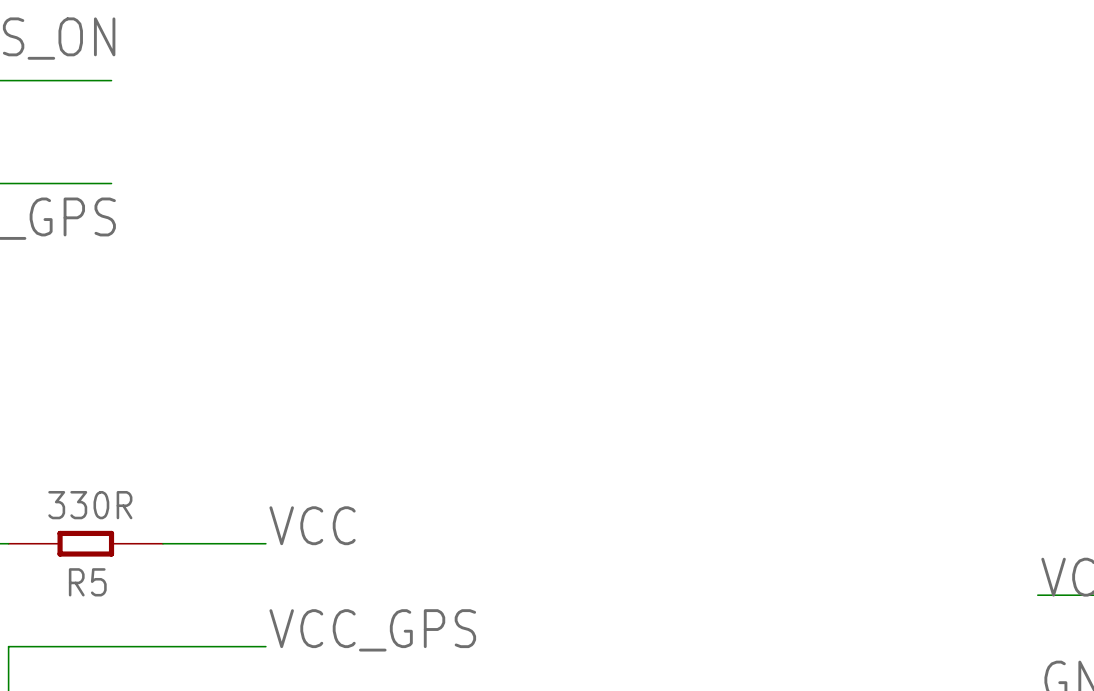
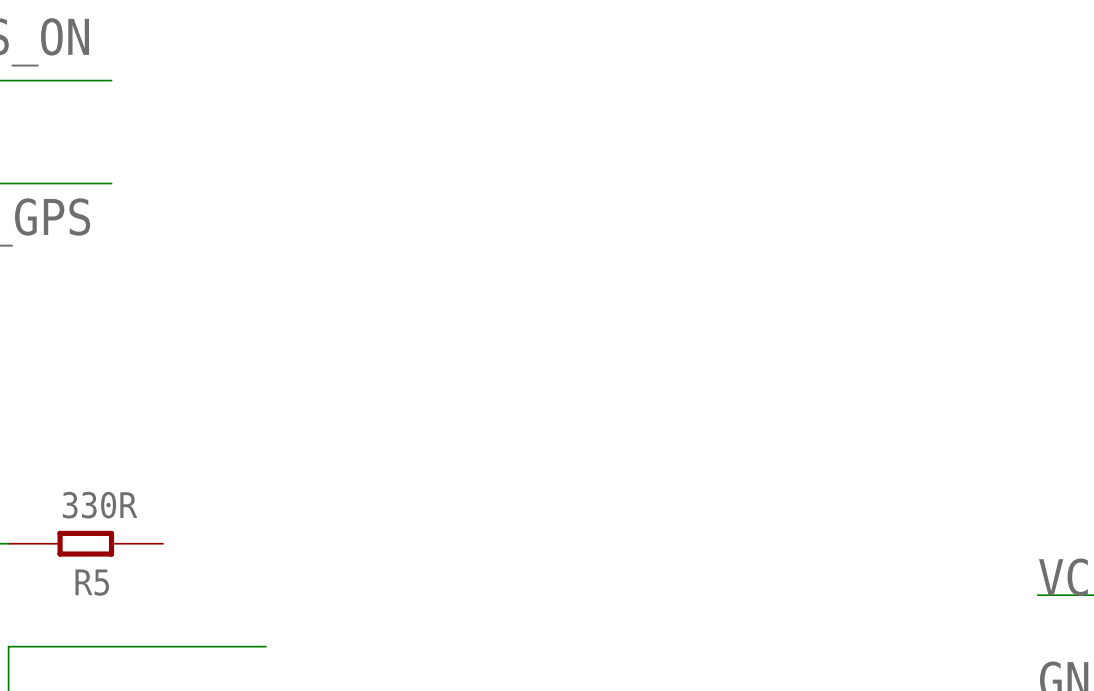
label: VCC (312, 525) -> none
wire: (162, 543) (265, 543) -> none
label: VCC_GPS (372, 630) -> none

